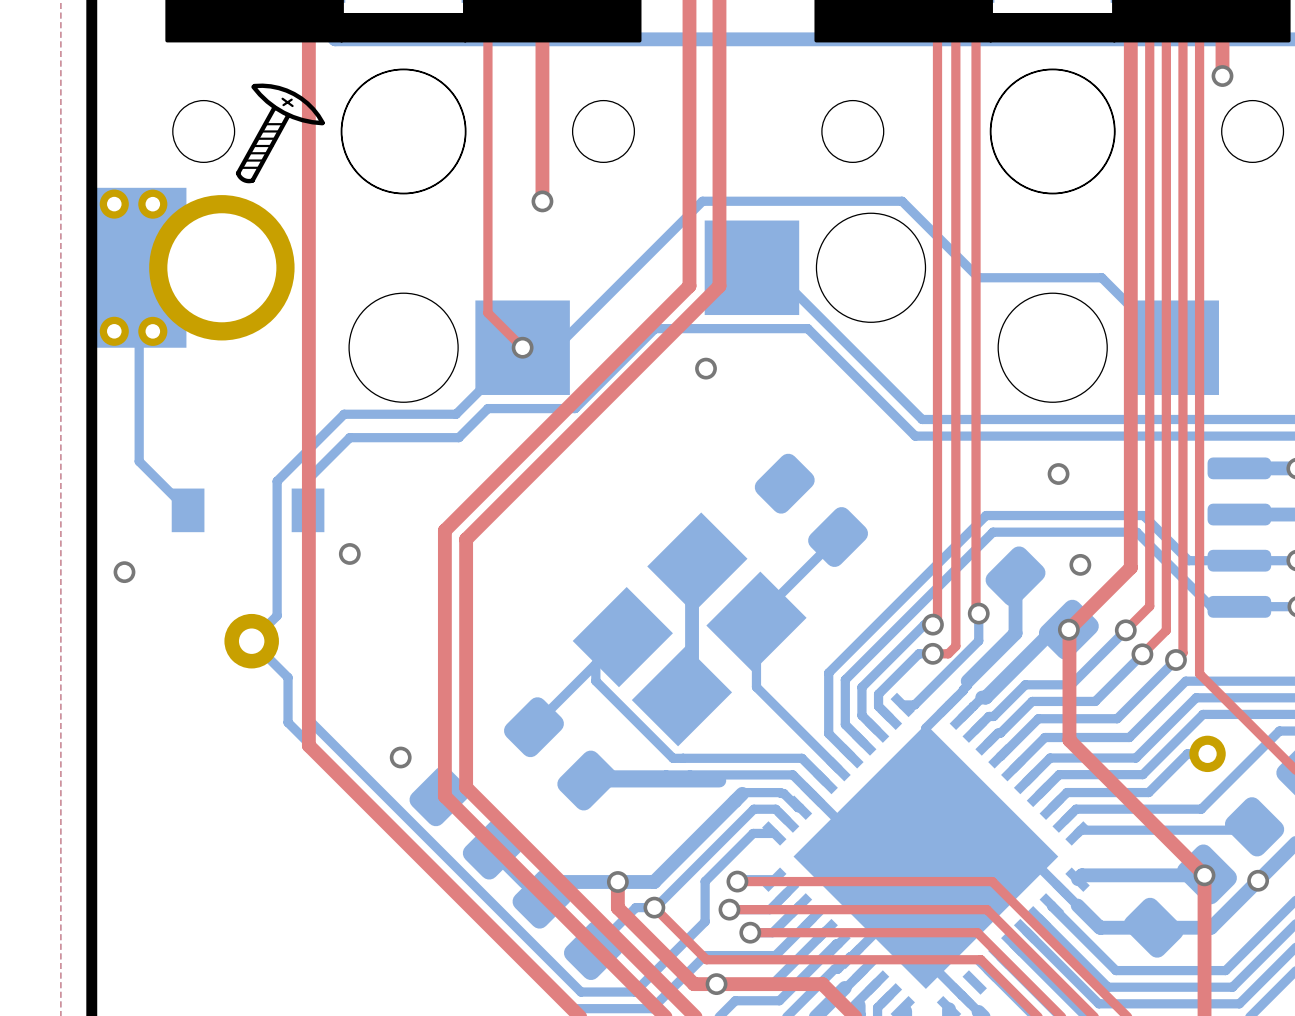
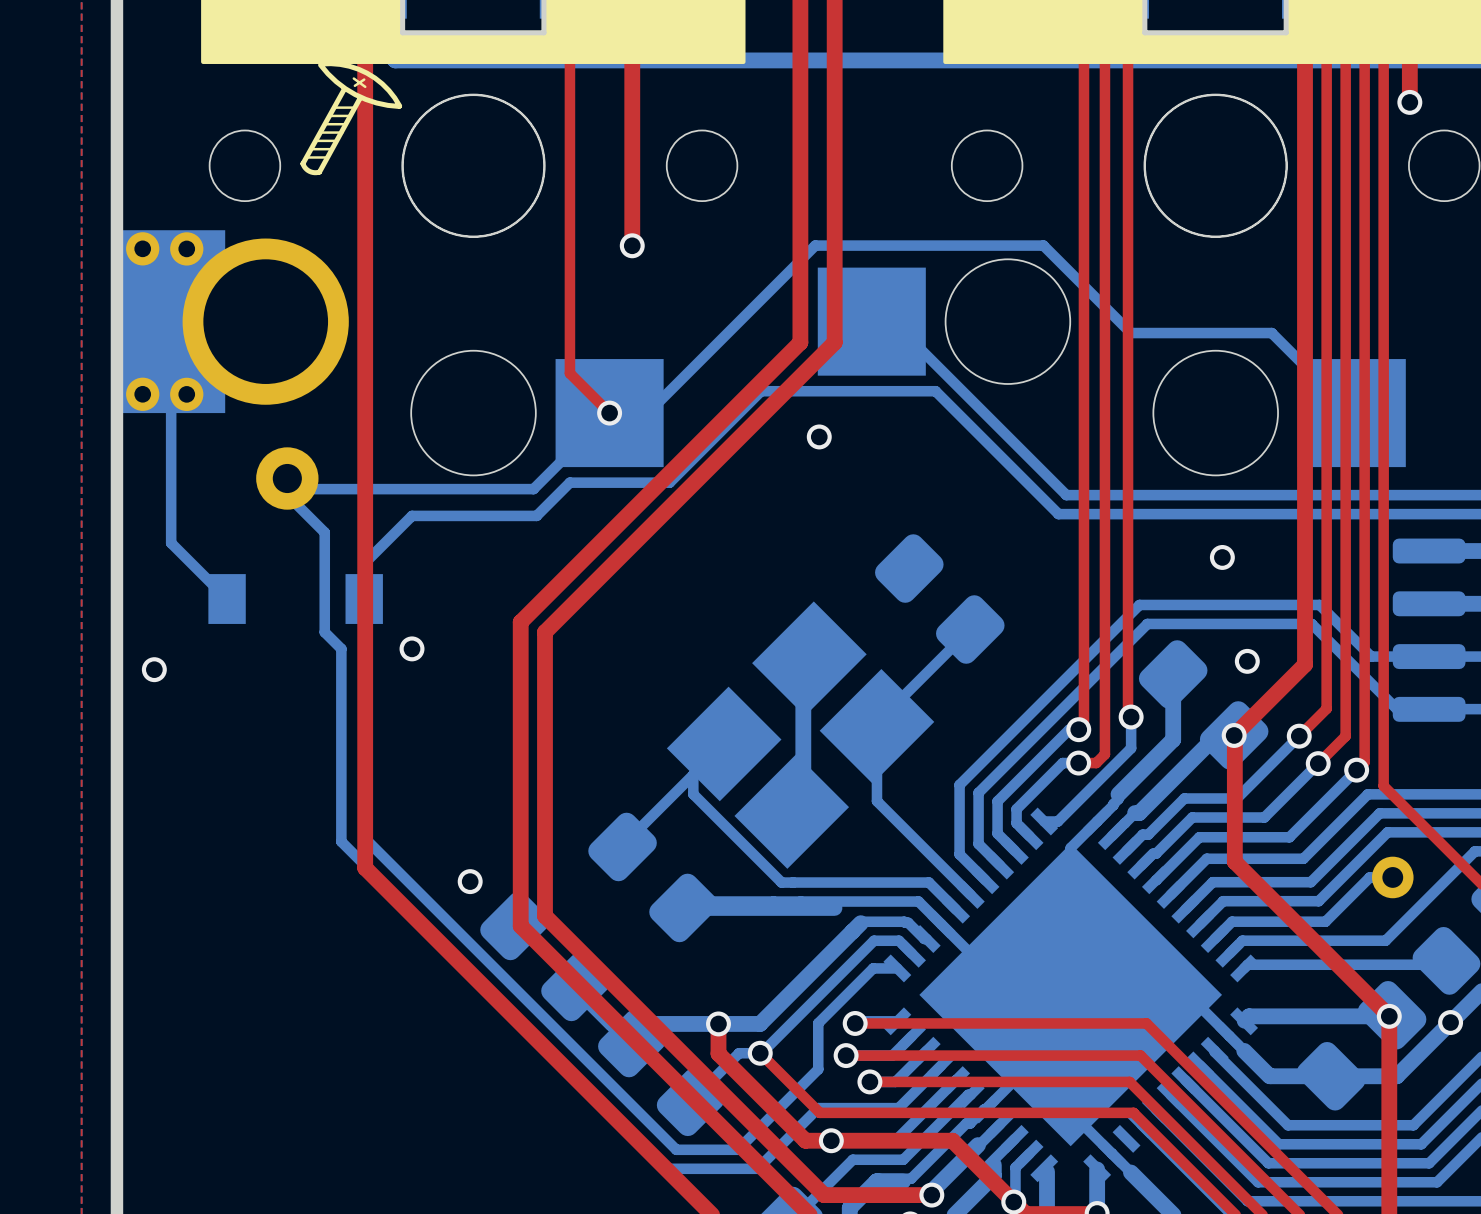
drawing position: (280, 133) -> (351, 118)
bottom track: (344, 414) (277, 481) (277, 615) (251, 641) (288, 677) -> (405, 489) (297, 489) (287, 478) (287, 495) (324, 532) (324, 632) (341, 648) (341, 790)
part position: (251, 641) -> (287, 478)

